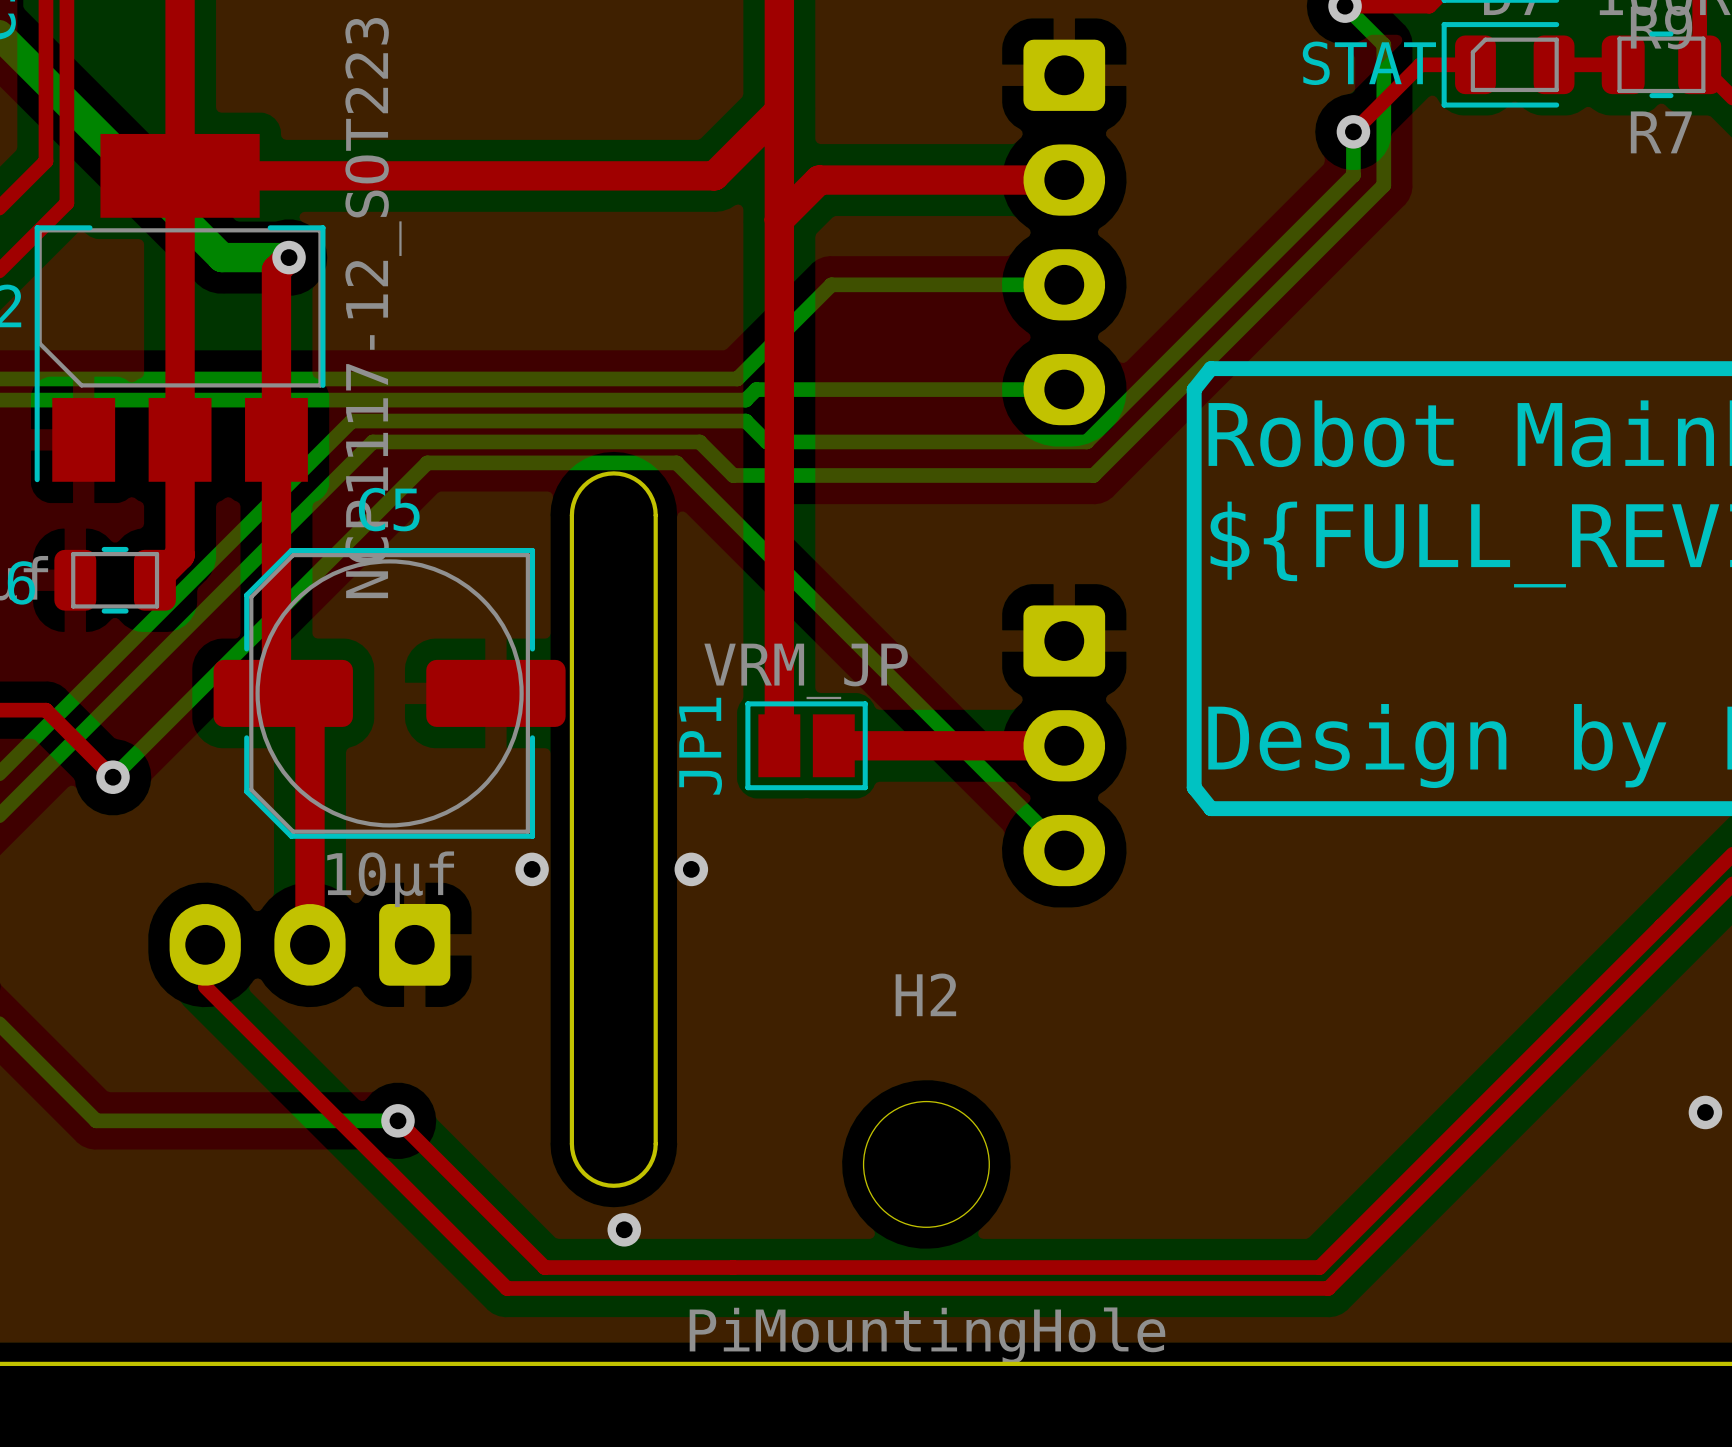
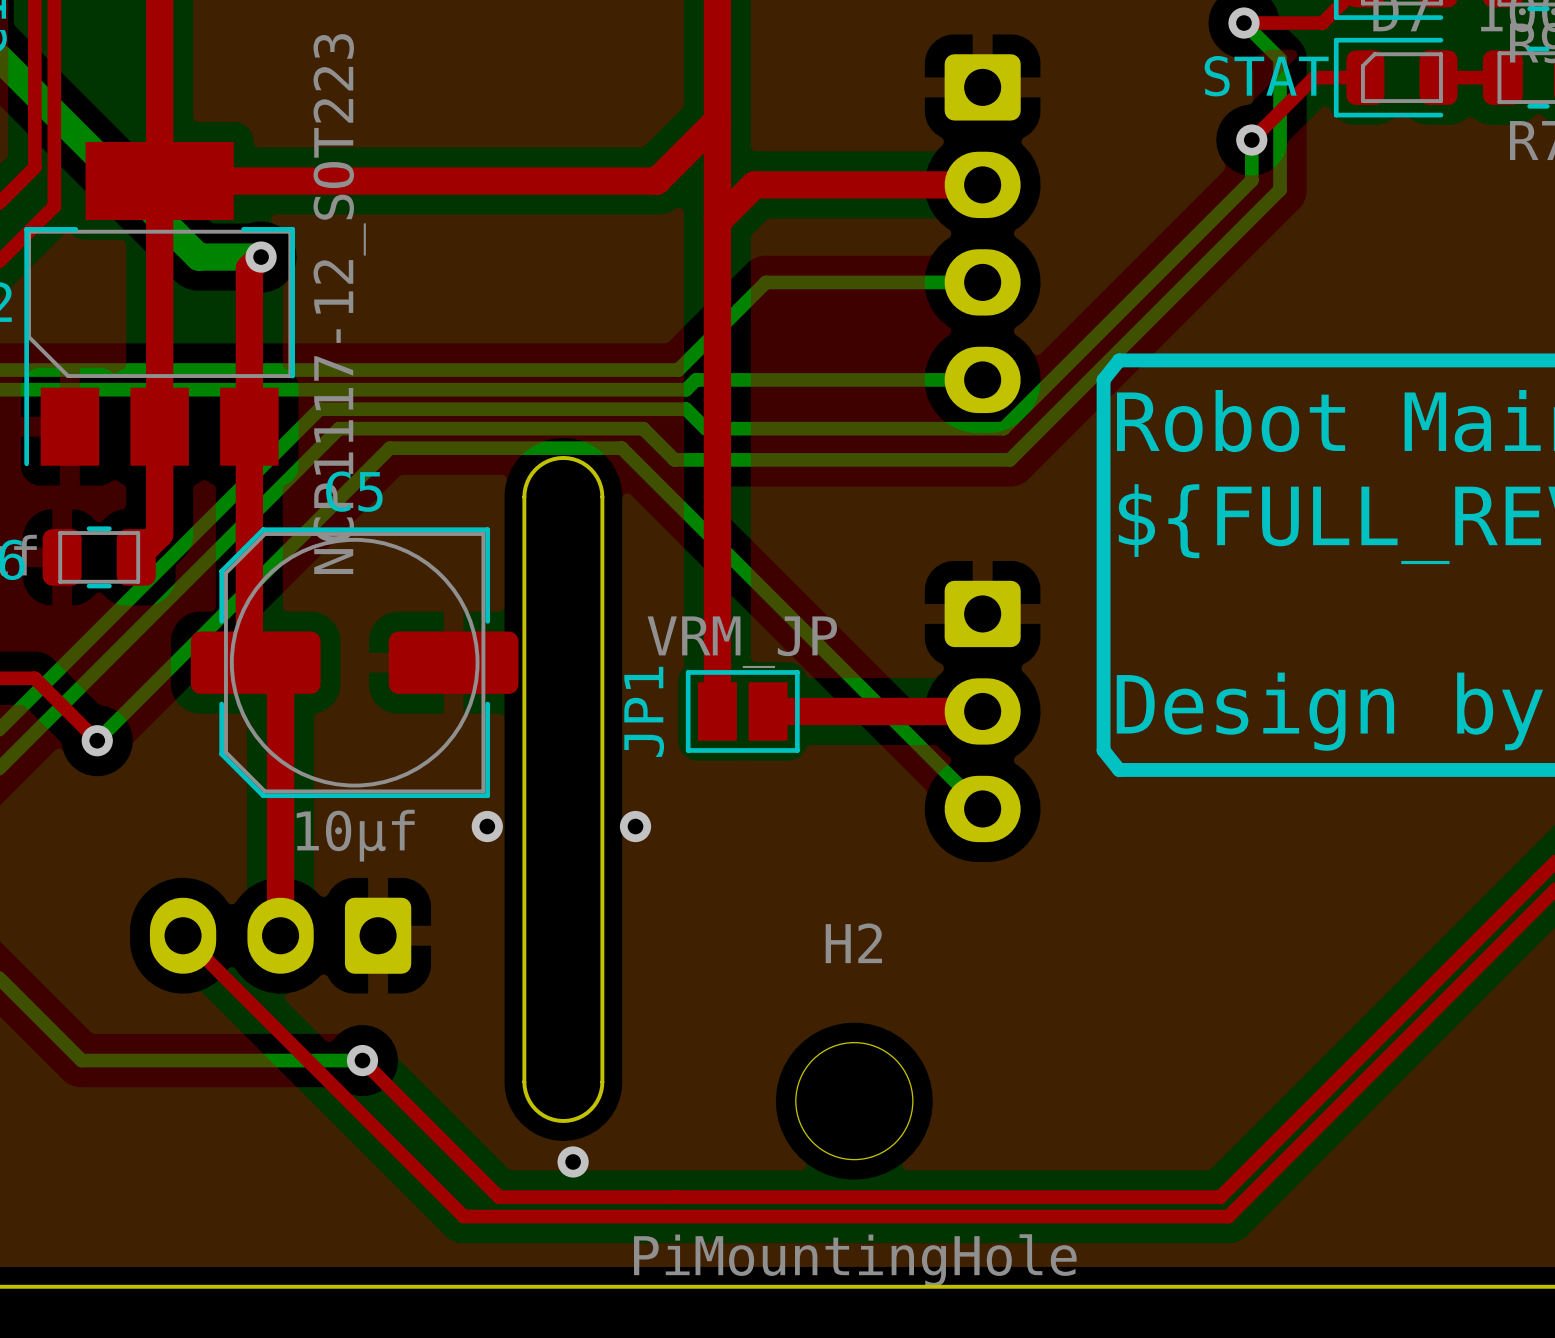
part position: (309, 944) -> (280, 935)

